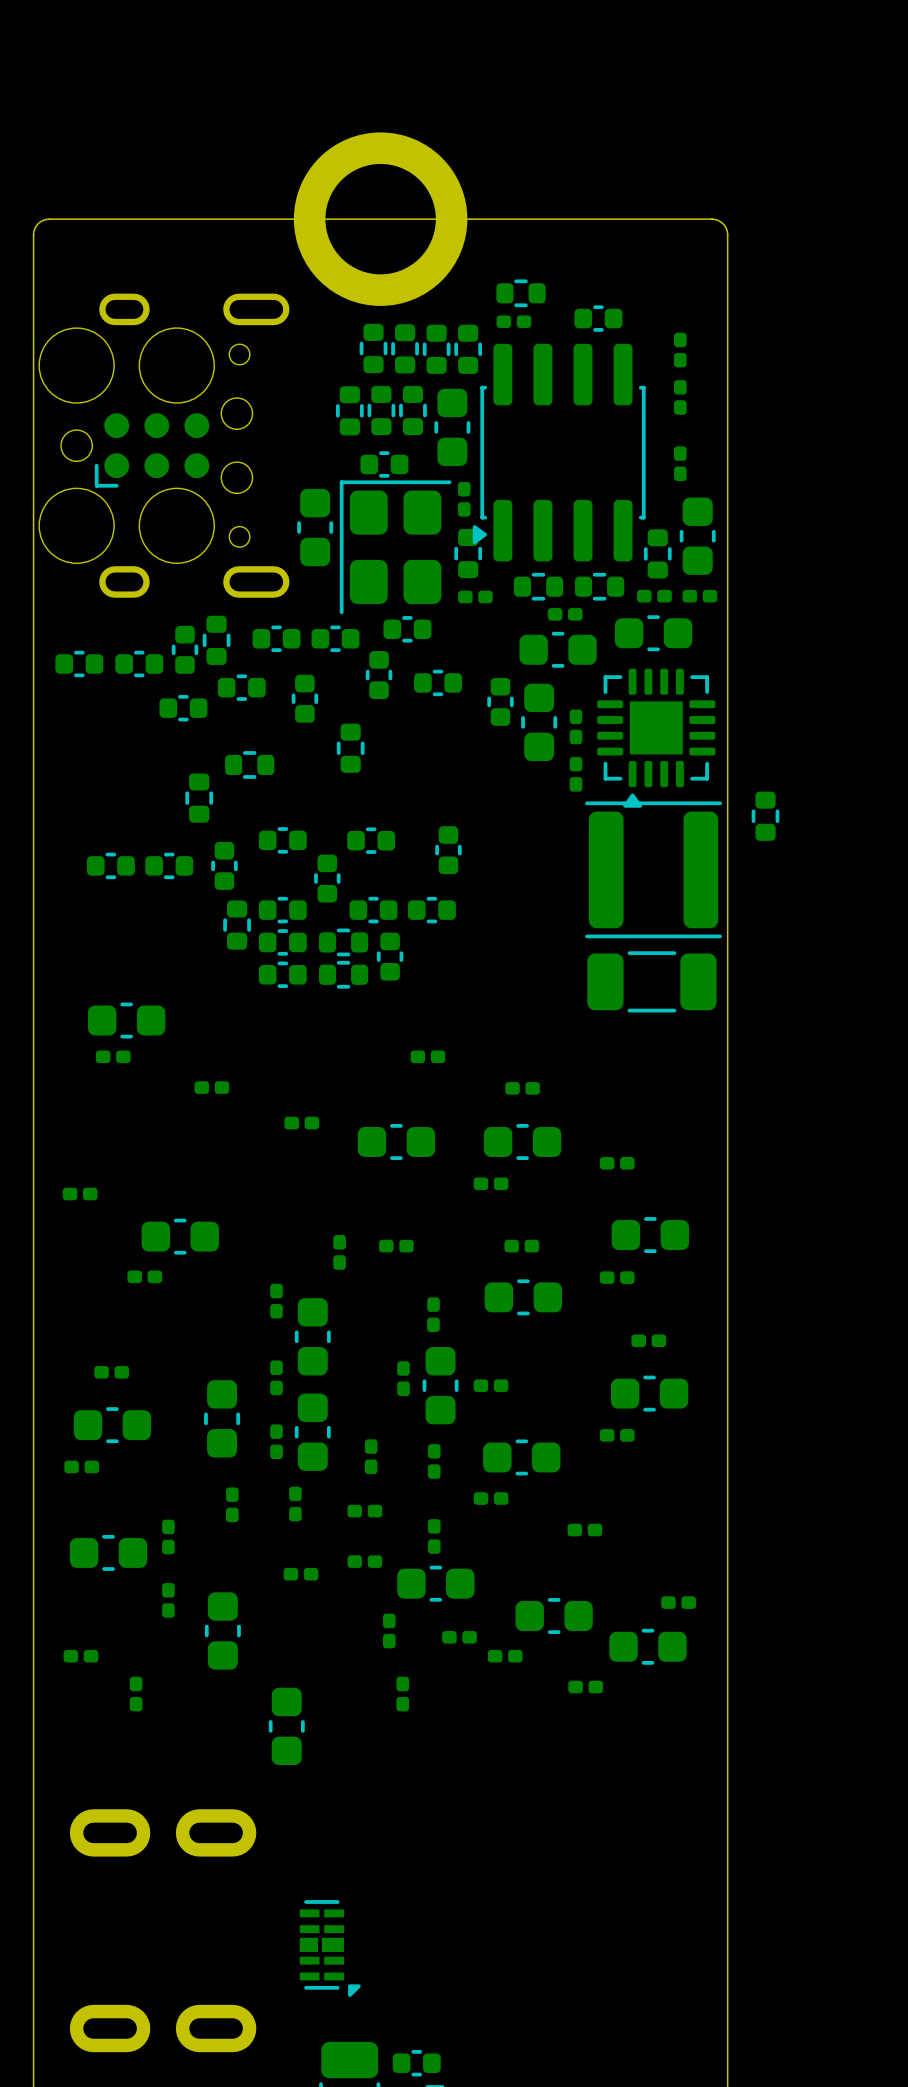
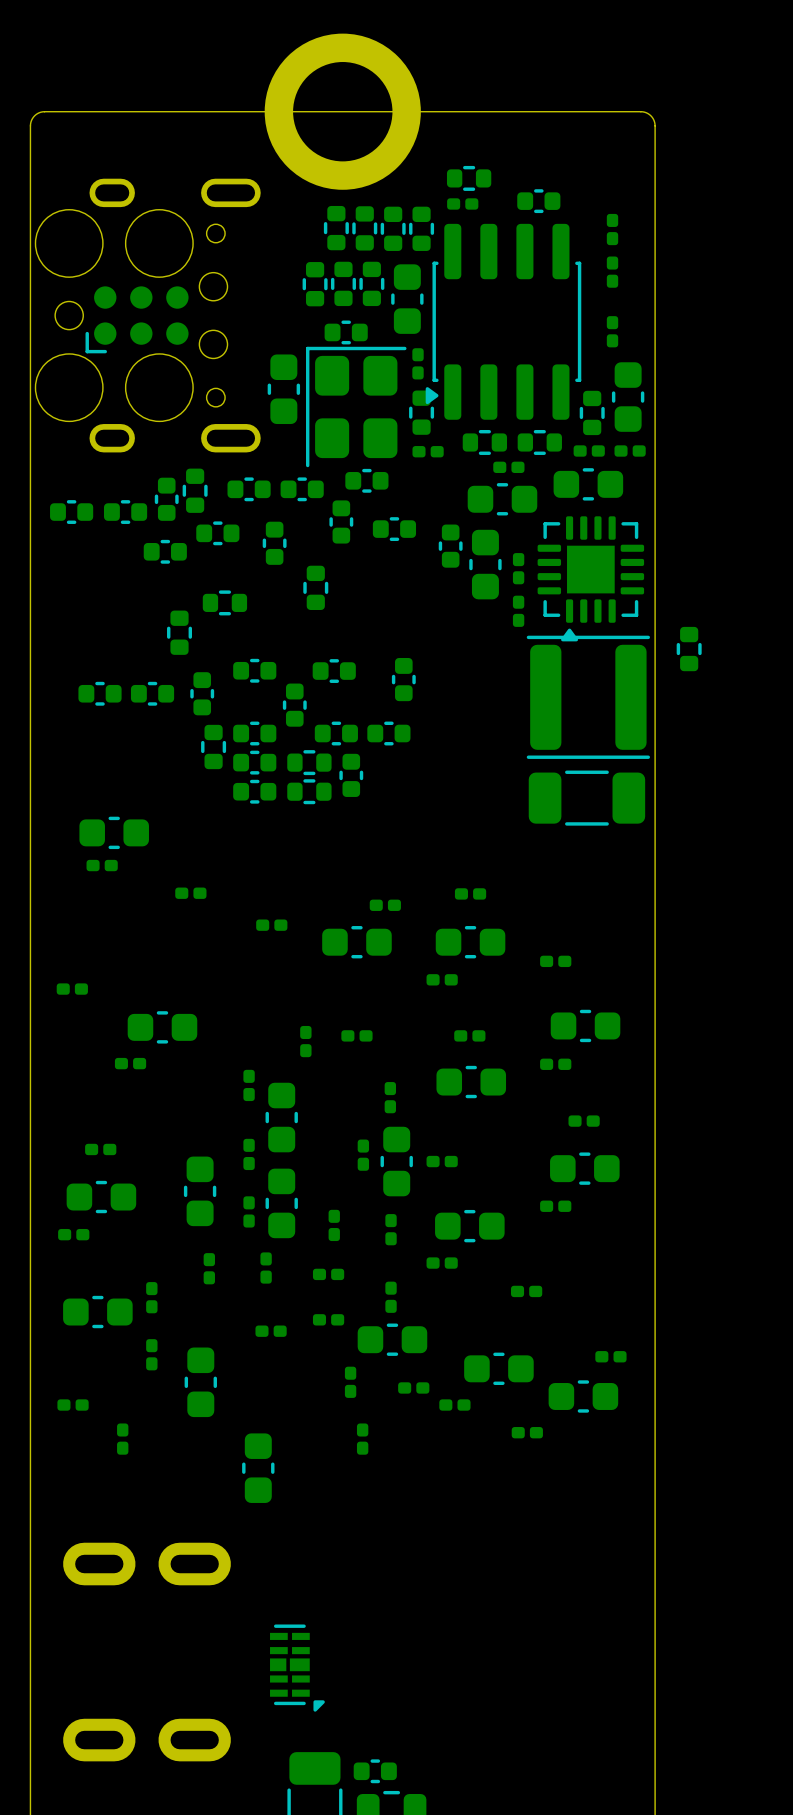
part position: (427, 1056) -> (385, 905)

